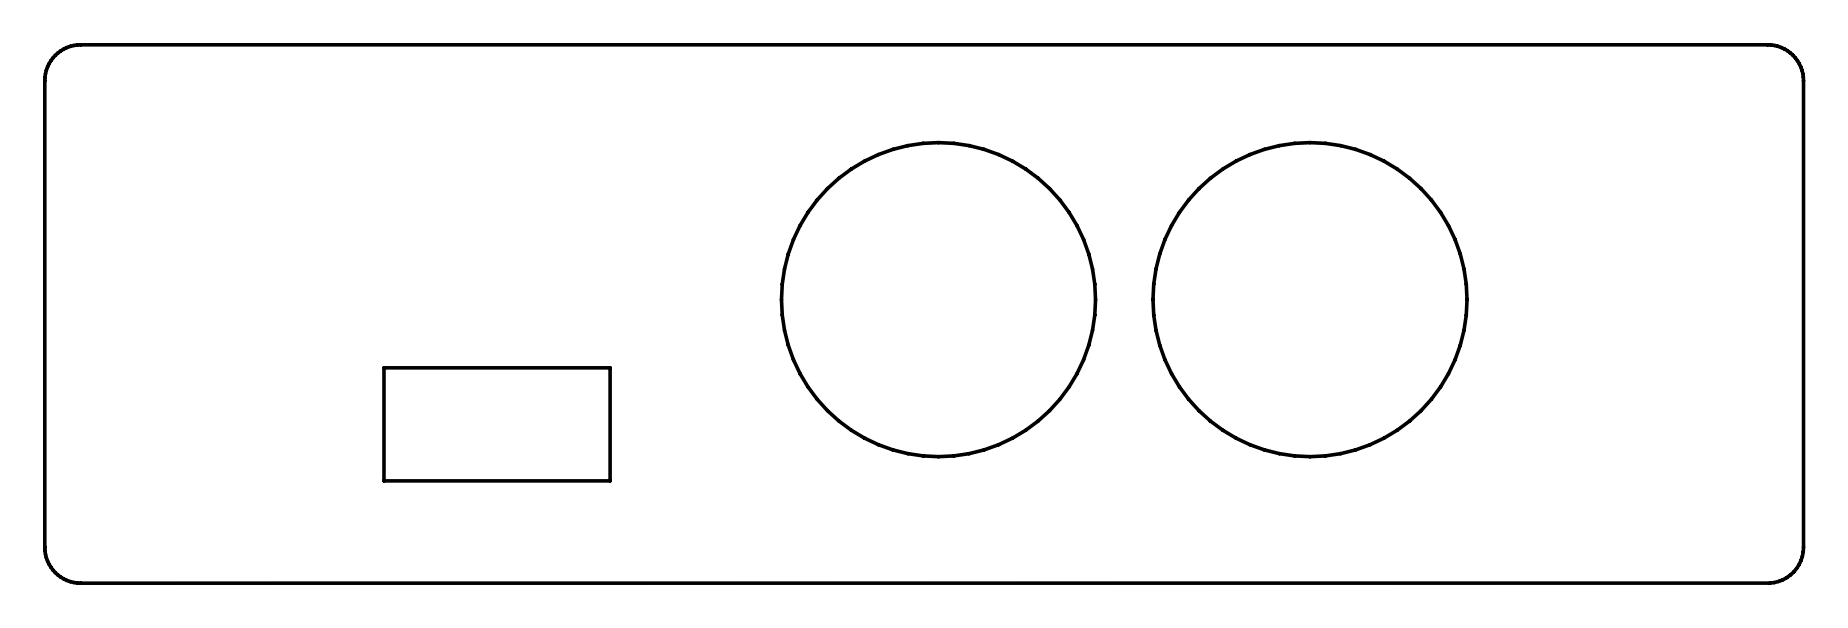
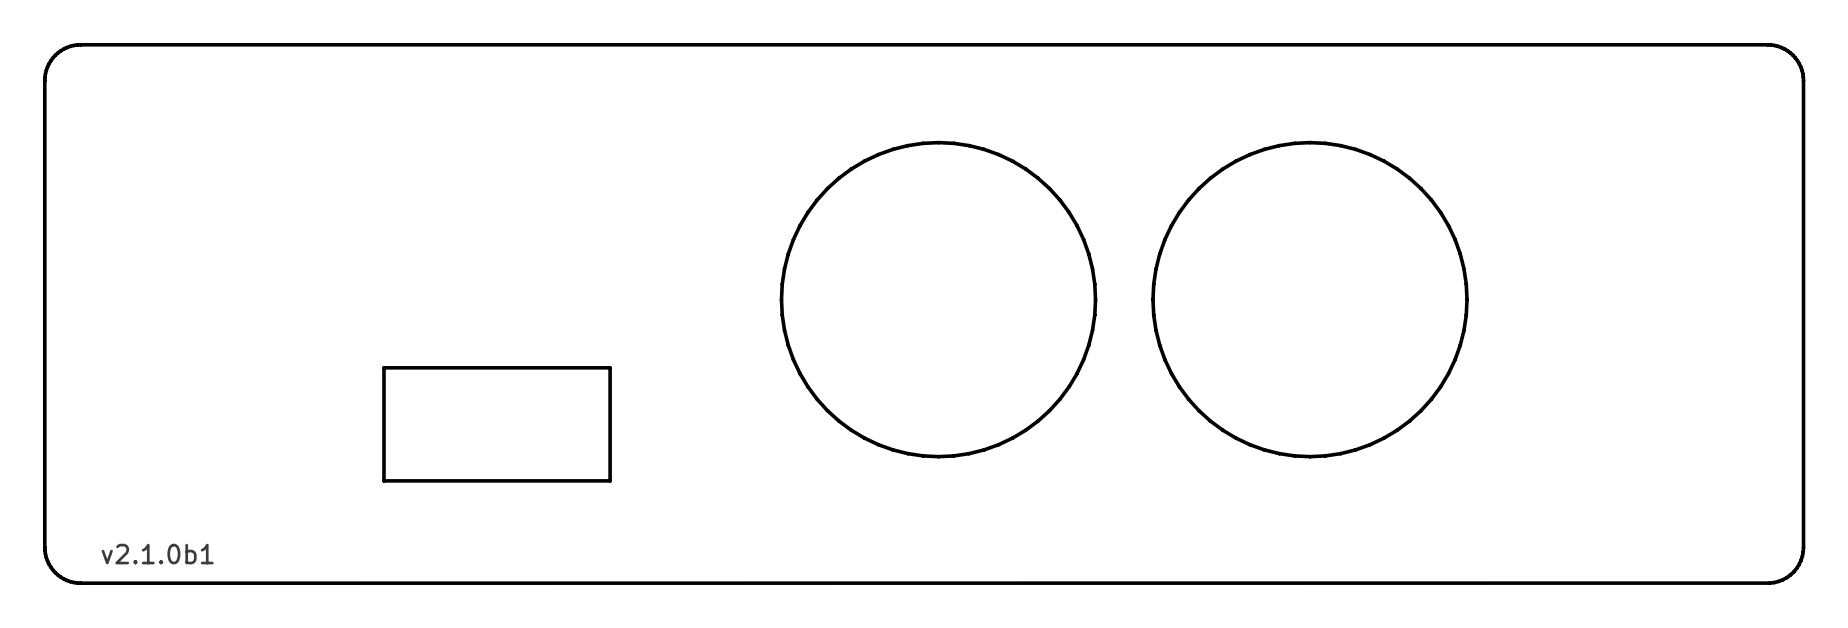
text: none -> v2.1.0b1 (157, 554)

